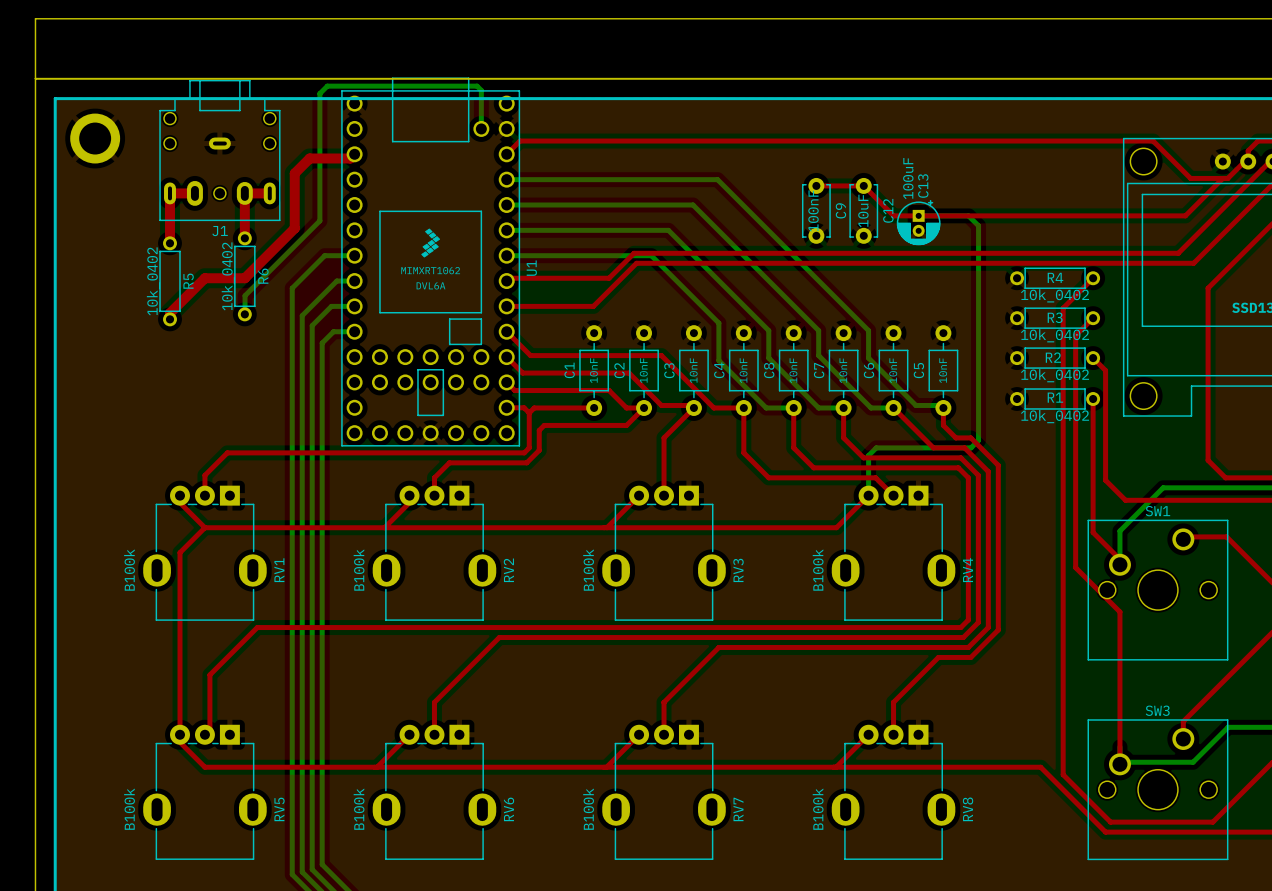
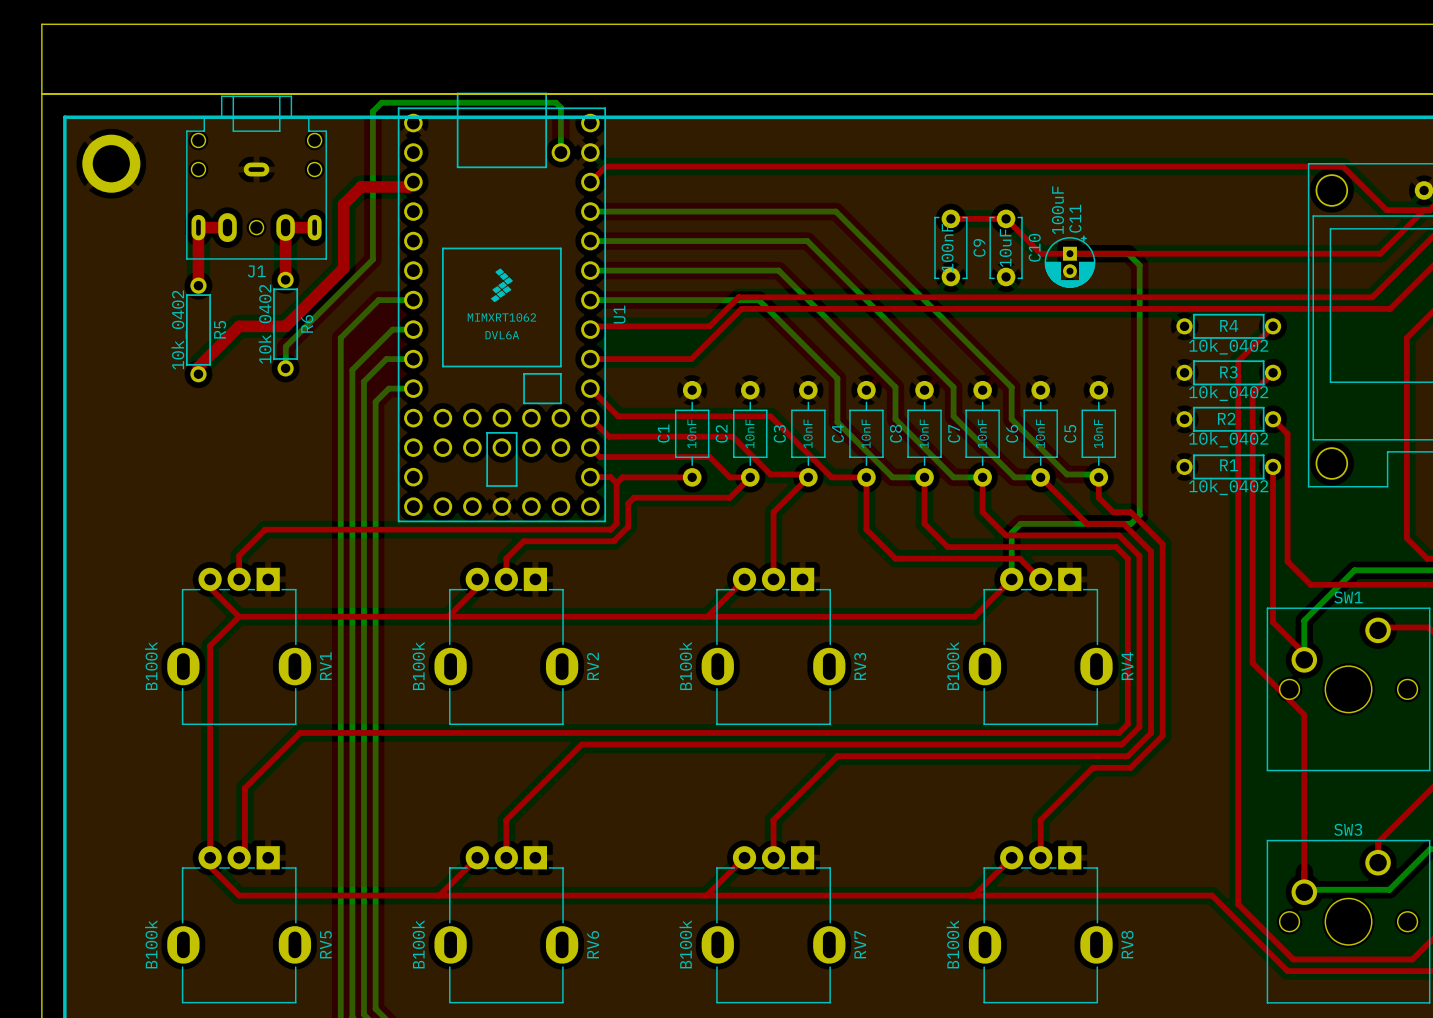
C13 name: C13 (923, 186) -> C11 (1075, 218)
C12 name: C12 (888, 210) -> C10 (1034, 247)

